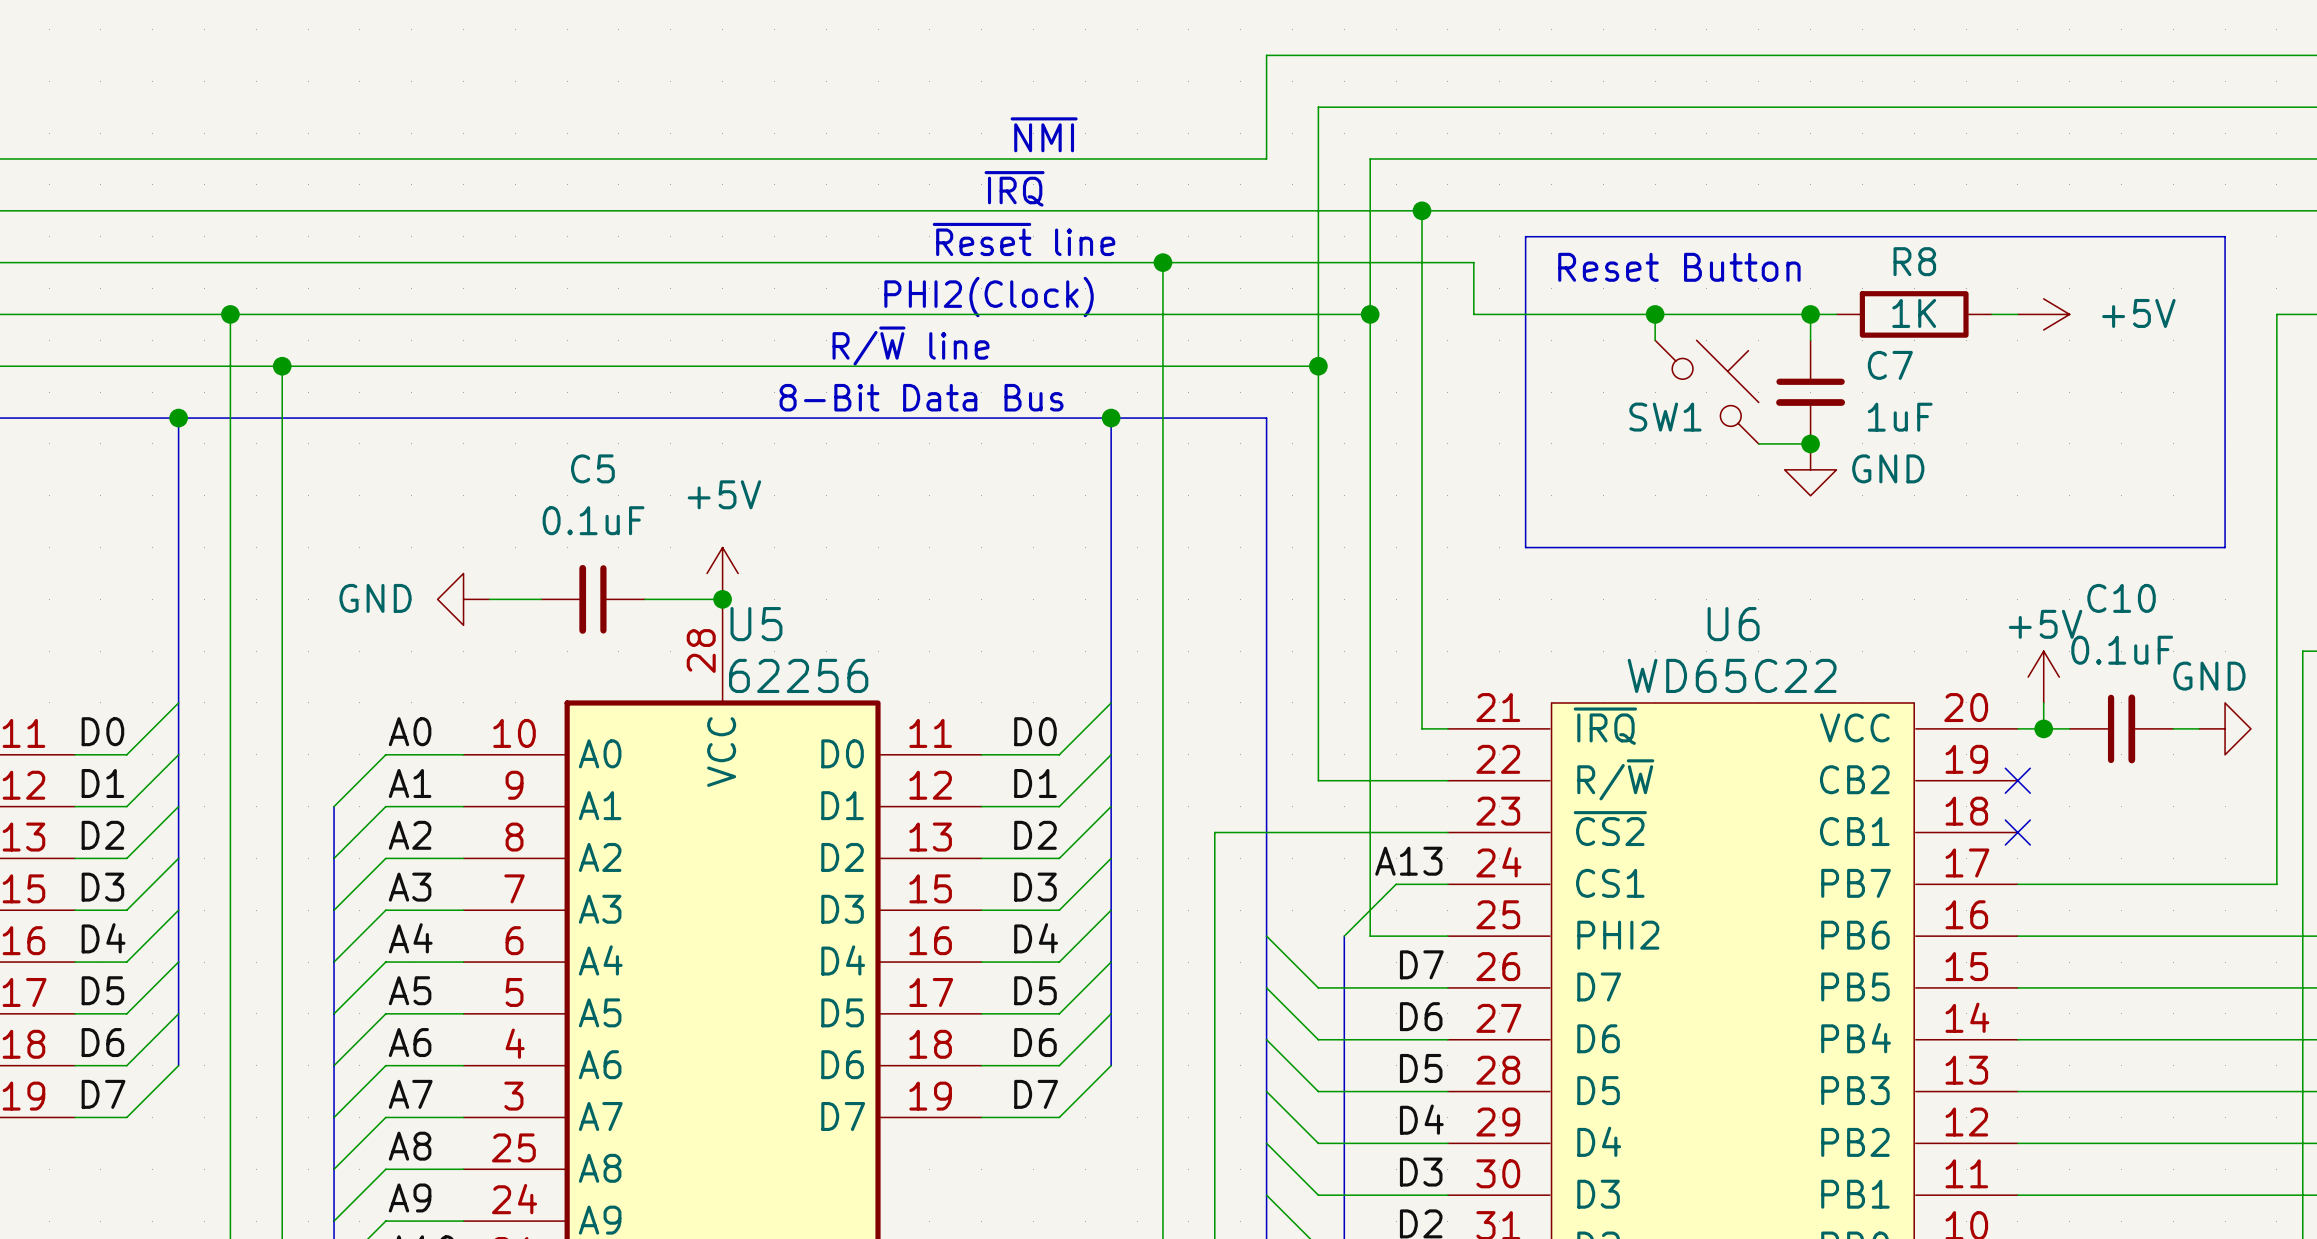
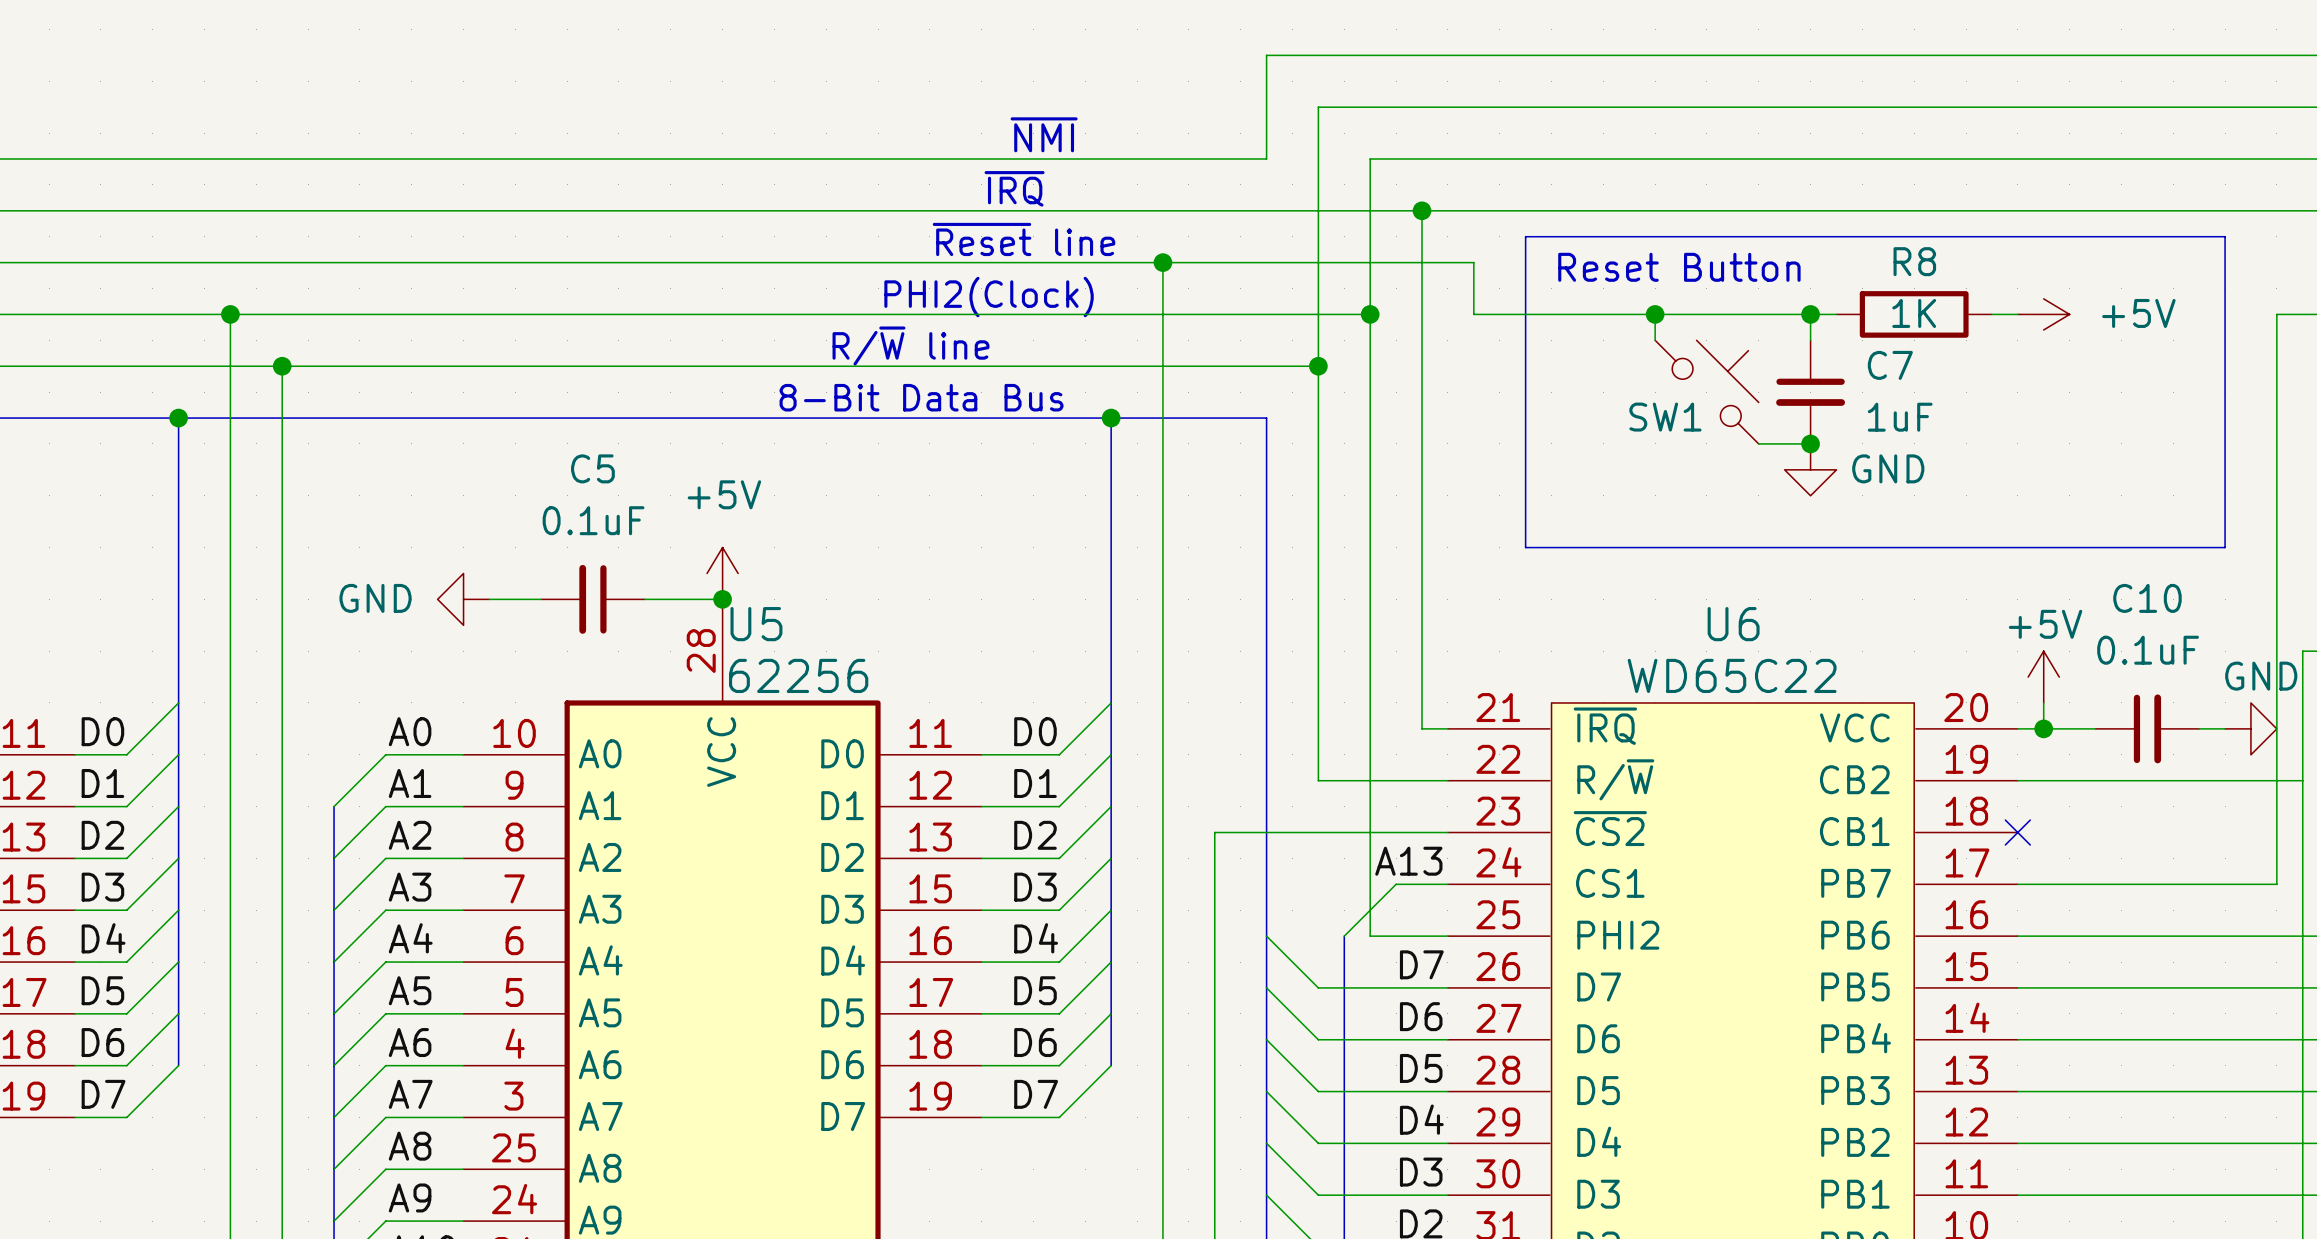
power symbol text position: GND (2209, 676) -> GND (2261, 676)
C10 position: (2121, 728) -> (2147, 728)
power symbol position: GND (2225, 728) -> GND (2250, 728)
wire: none -> (2017, 780) (2302, 780)
no-connect mark: (2017, 780) -> none

